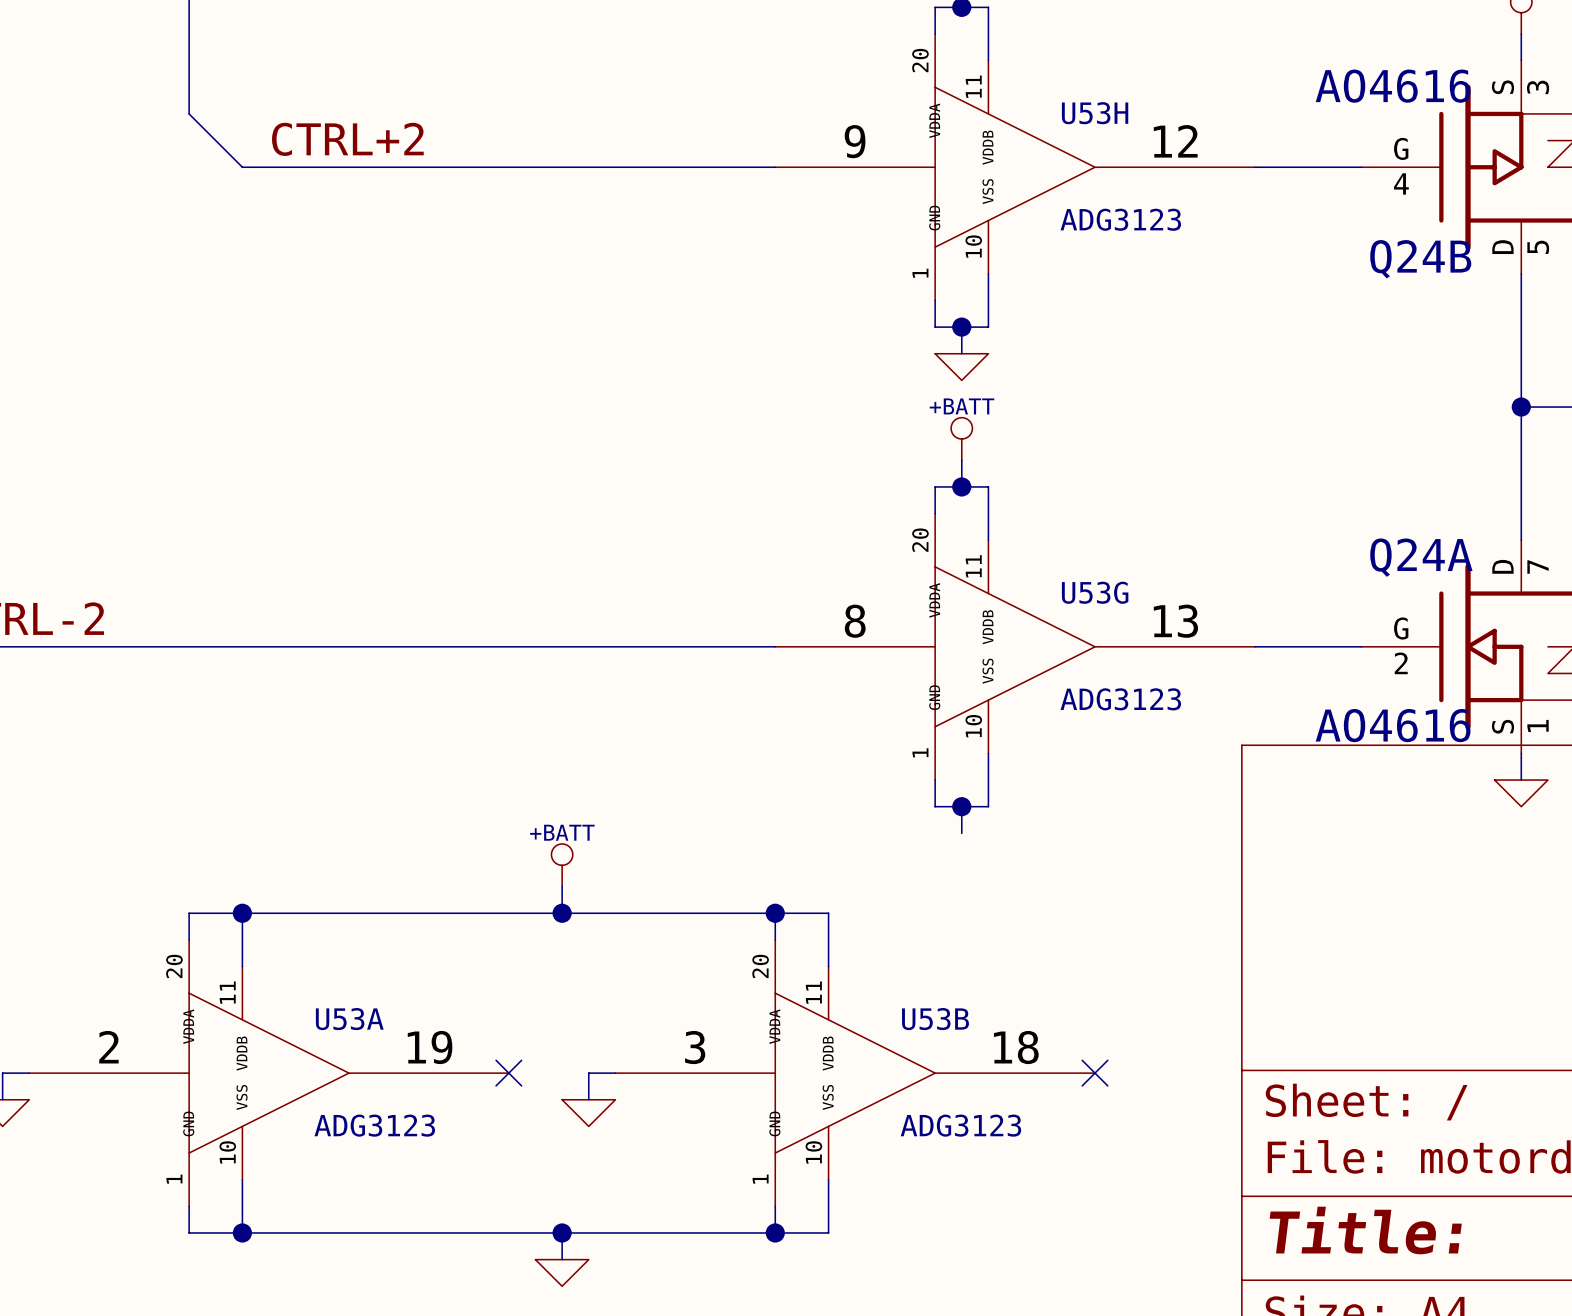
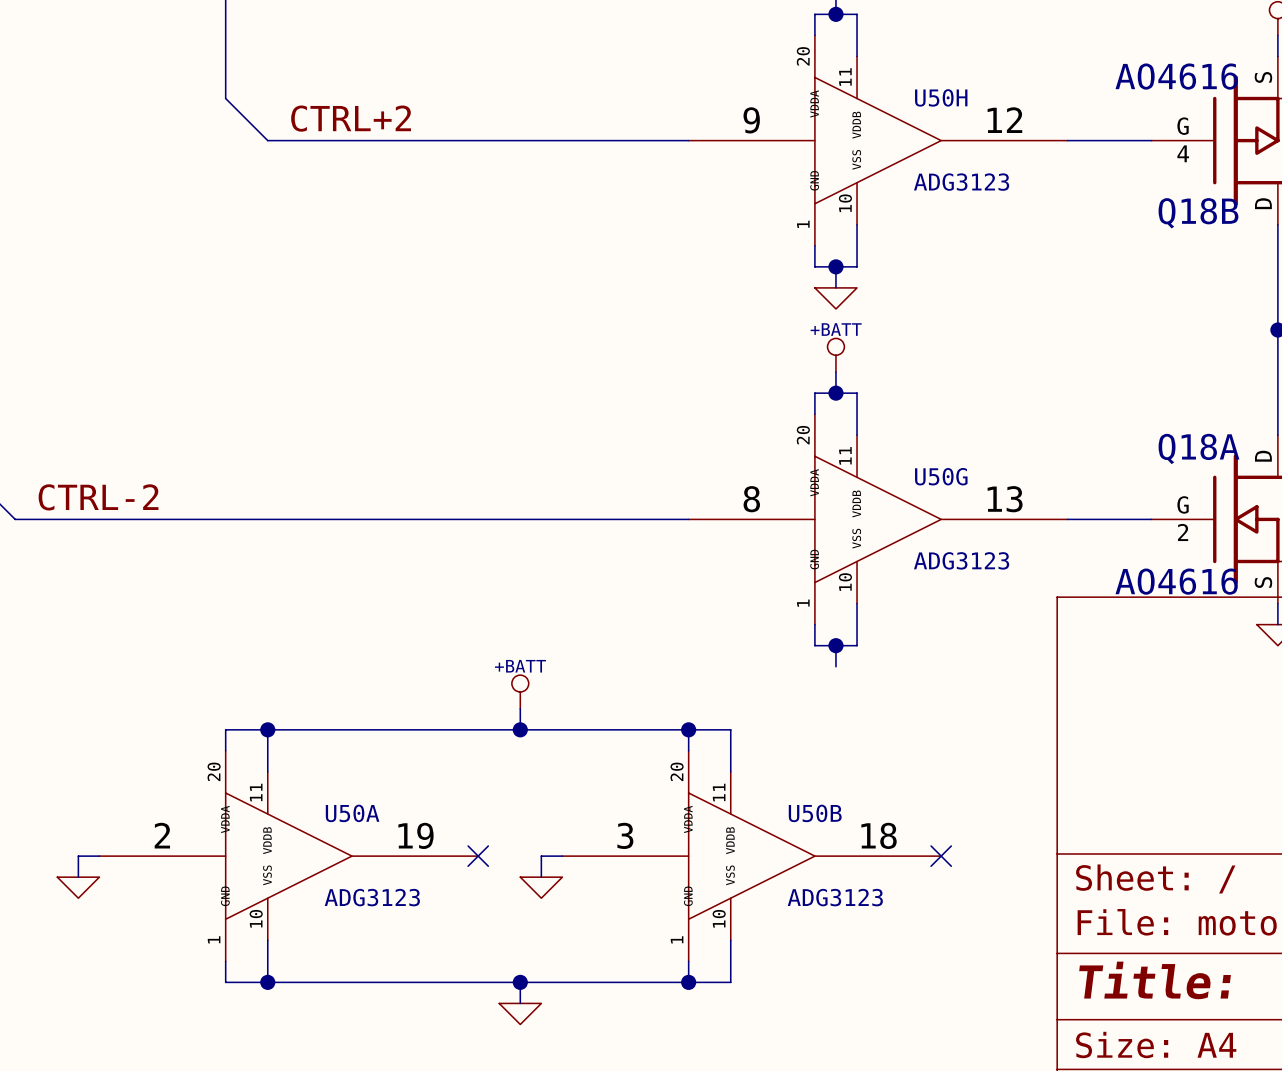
U53H name: U53H (1095, 113) -> U50H (941, 97)
Q24B name: Q24B (1420, 259) -> Q18B (1198, 213)
Q24A name: Q24A (1421, 557) -> Q18A (1198, 448)
U53G name: U53G (1095, 592) -> U50G (941, 476)
U53A name: U53A (349, 1019) -> U50A (352, 813)
U53B name: U53B (935, 1019) -> U50B (815, 813)

